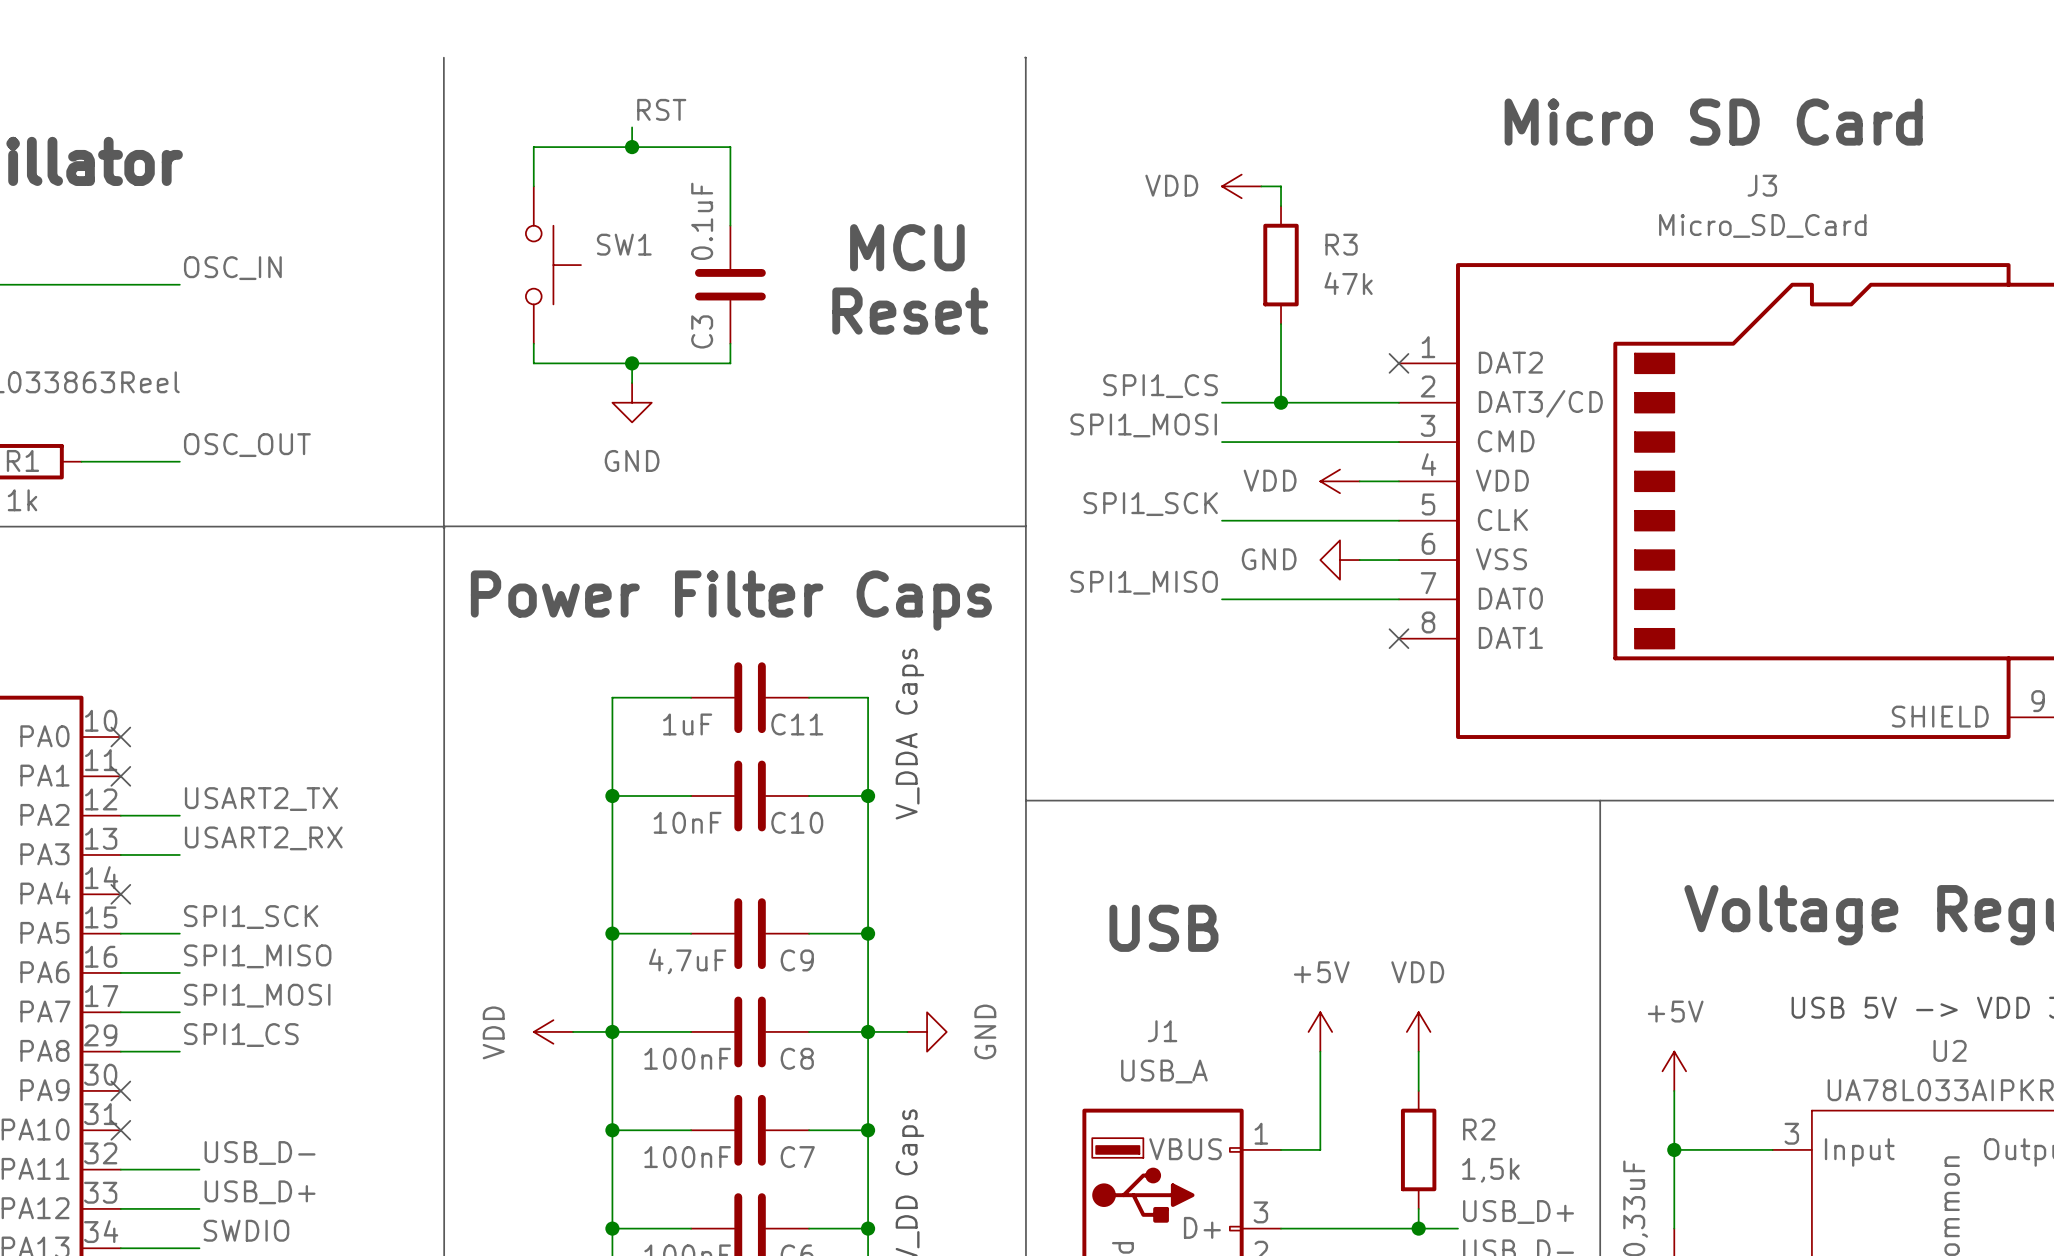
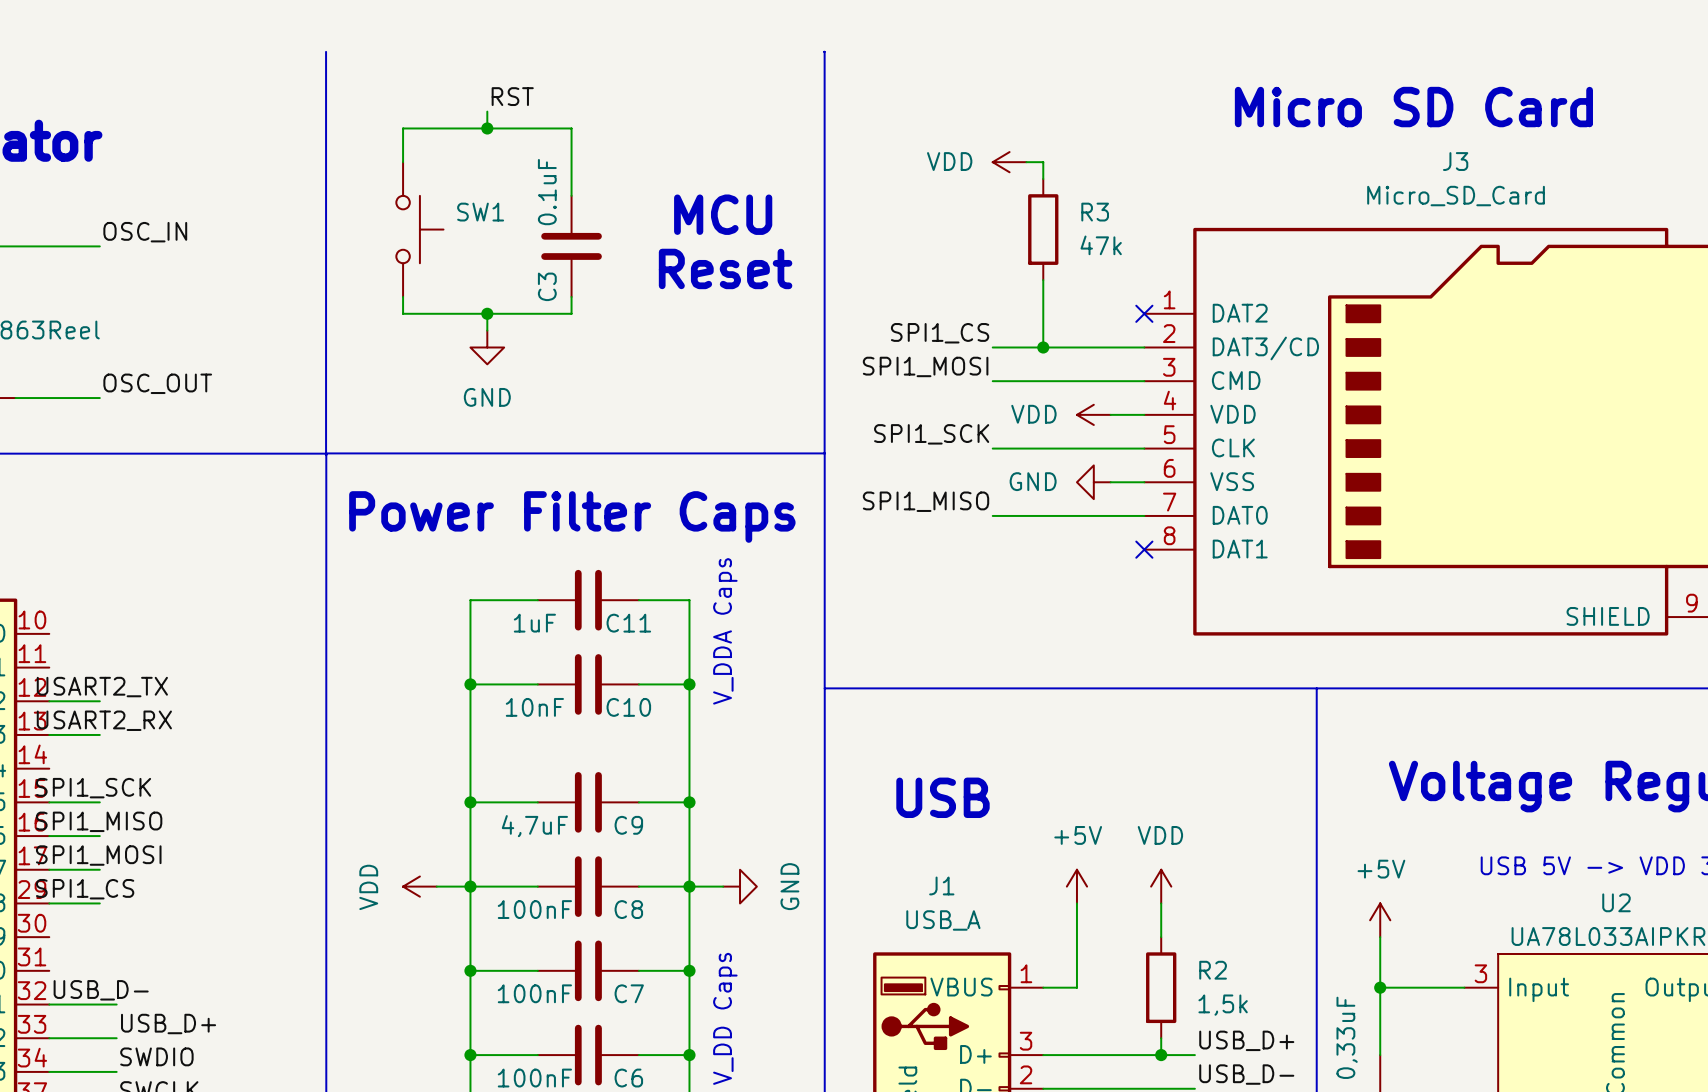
no-connect mark: (120, 737) -> none
no-connect mark: (120, 776) -> none
label position: USART2_TX (261, 799) -> USART2_TX (102, 687)
label position: USART2_RX (263, 838) -> USART2_RX (104, 720)
no-connect mark: (120, 894) -> none
label position: SPI1_SCK (251, 917) -> SPI1_SCK (93, 788)
label position: SPI1_MISO (257, 956) -> SPI1_MISO (99, 821)
label position: SPI1_MOSI (257, 995) -> SPI1_MOSI (98, 855)
label position: SPI1_CS (241, 1035) -> SPI1_CS (85, 889)
no-connect mark: (120, 1090) -> none
no-connect mark: (120, 1130) -> none
label position: USB_D- (260, 1153) -> USB_D- (101, 990)

